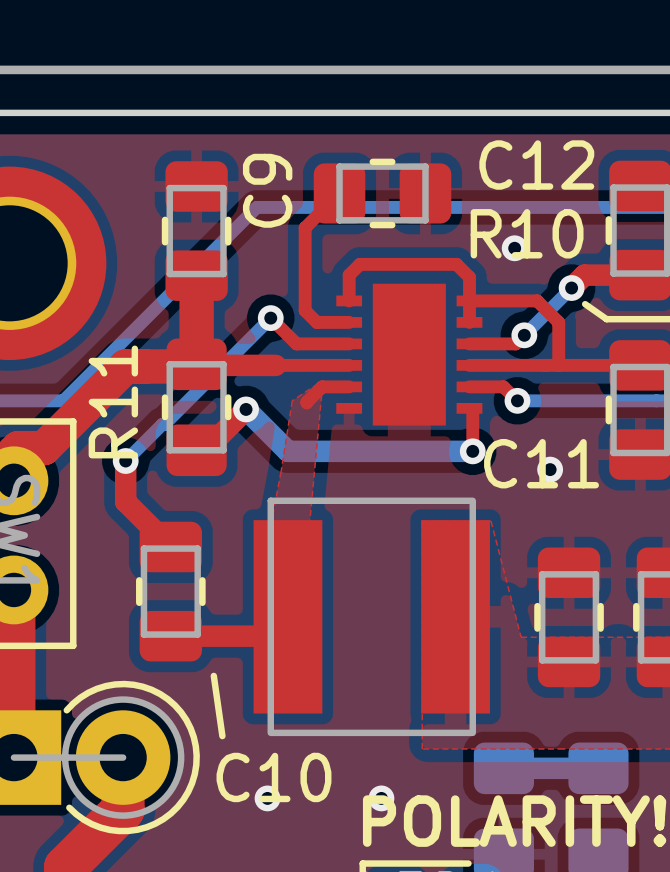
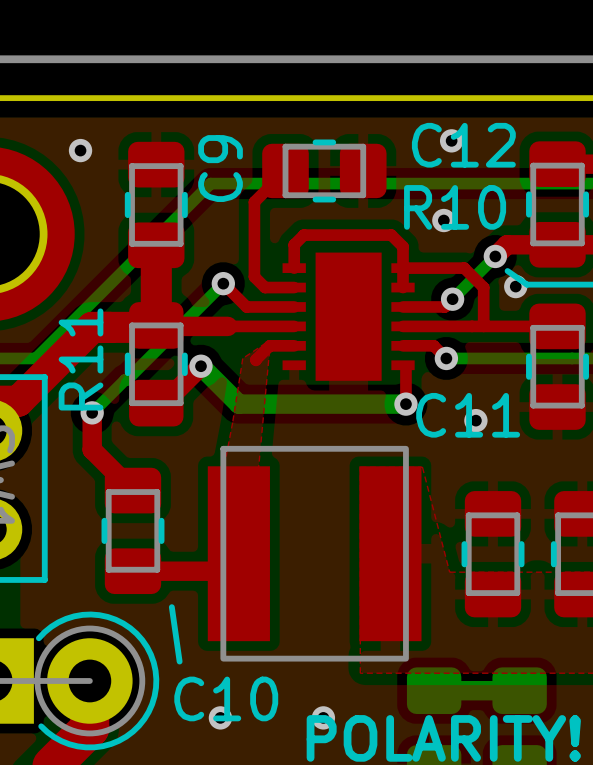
via: none -> (451, 140)
via: none -> (80, 150)
via: none -> (515, 286)

